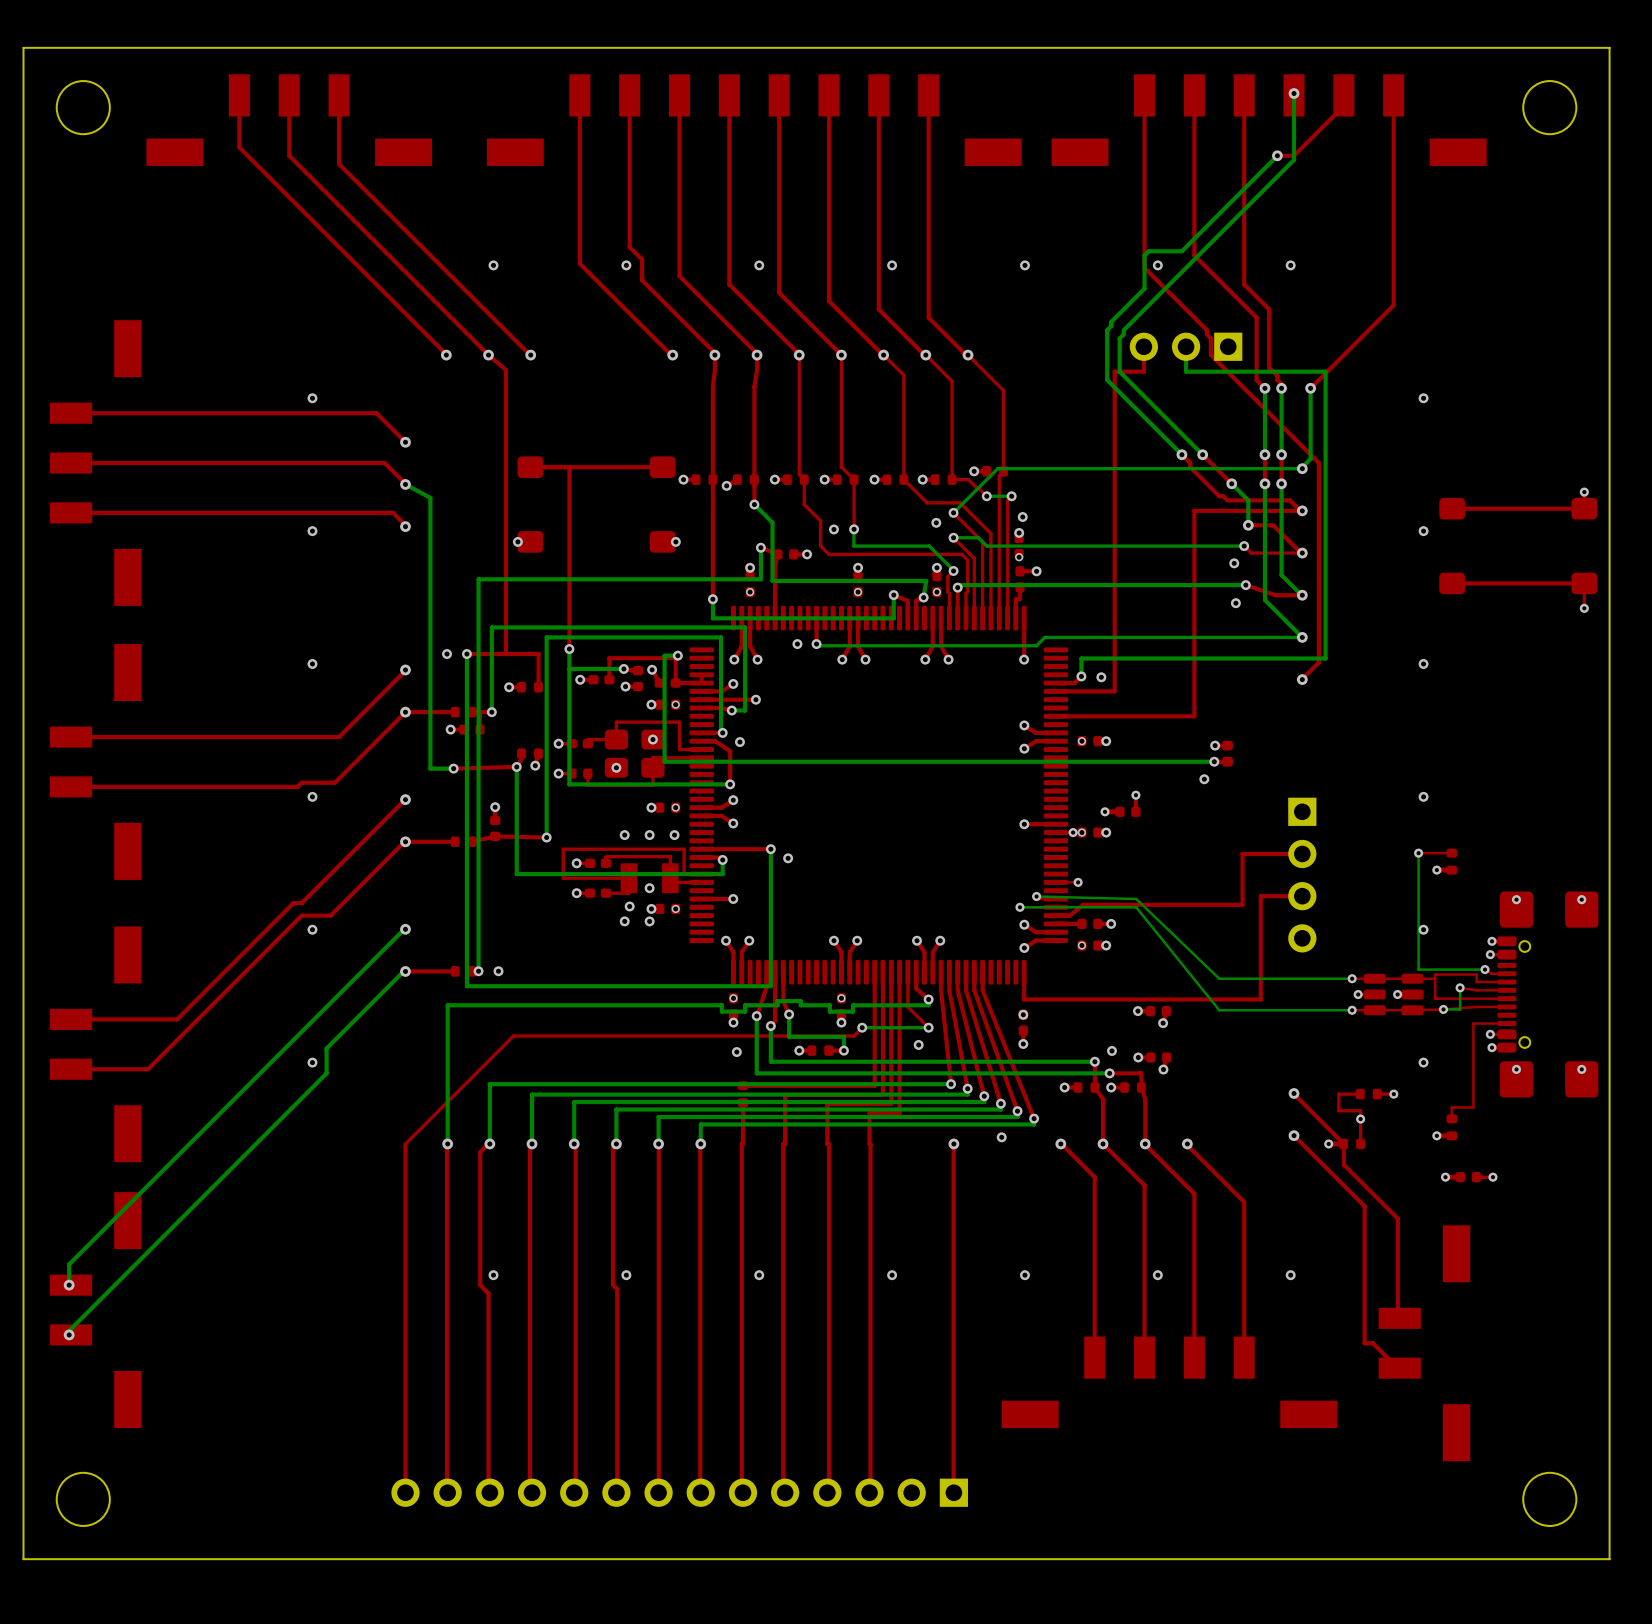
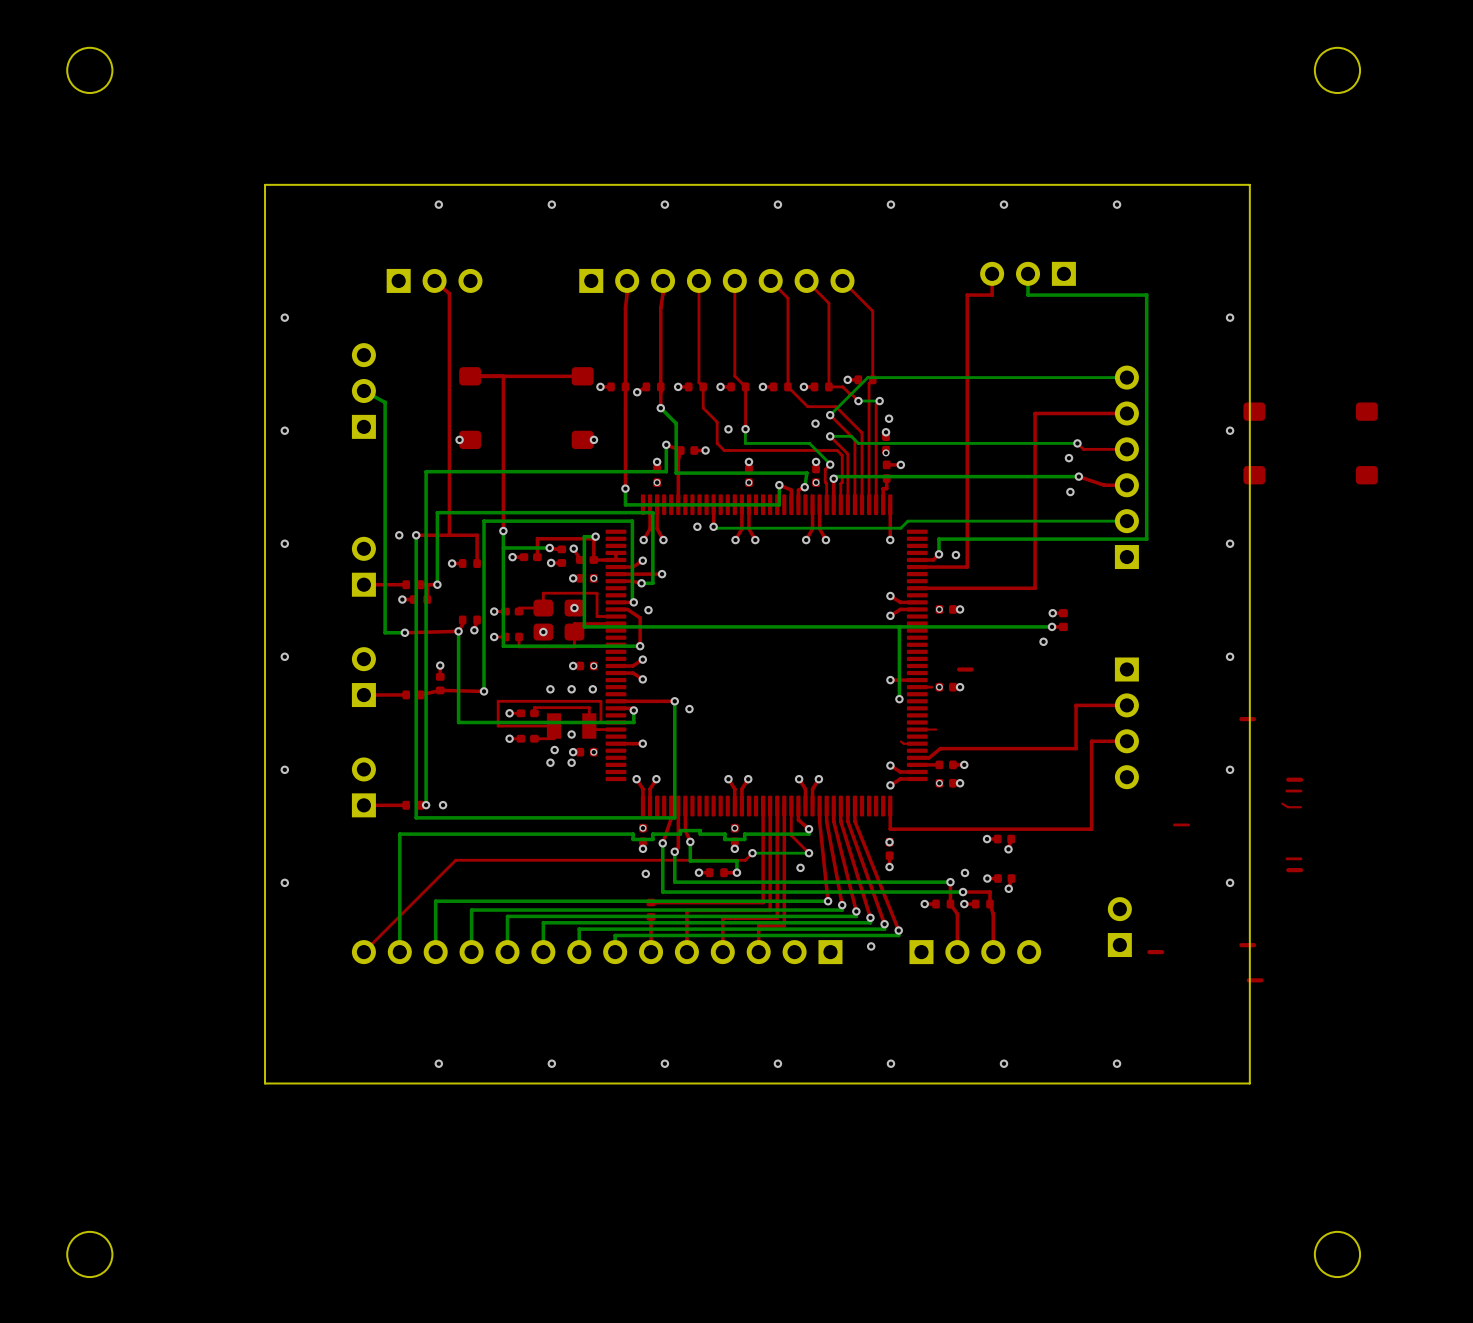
board edge: (1609, 47) (23, 47) (23, 1559) (1609, 1559) (1609, 47) -> (1249, 184) (1249, 1083) (265, 1083) (265, 184) (1249, 184)
top track: (239, 93) (239, 147) (446, 355) -> none
top track: (289, 93) (289, 155) (488, 355) -> none
top track: (339, 93) (339, 164) (530, 355) -> none
top track: (579, 93) (579, 263) (672, 355) -> none
top track: (629, 93) (629, 247) (642, 259) (642, 280) (716, 355) (714, 355) -> none
top track: (679, 93) (679, 276) (757, 355) -> none
top track: (729, 93) (729, 284) (799, 355) -> none
top track: (779, 93) (779, 292) (841, 355) -> none
top track: (828, 93) (828, 301) (883, 355) -> none
top track: (878, 93) (878, 309) (925, 355) -> none
top track: (928, 93) (928, 317) (968, 355) -> none
top track: (1144, 93) (1144, 267) (1206, 330) (1206, 334) (1210, 338) (1210, 355) (1318, 463) (1318, 662) (1302, 679) -> none
top track: (1194, 93) (1194, 255) (1256, 317) (1256, 379) (1264, 388) -> none
top track: (1244, 93) (1244, 284) (1269, 309) (1269, 367) (1277, 375) (1281, 388) -> none
bottom track: (1294, 93) (1294, 159) (1123, 330) (1123, 334) (1119, 338) (1119, 371) (1202, 454) -> none
via: (1294, 93) -> none
top track: (1343, 93) (1343, 105) (1294, 155) (1277, 155) -> none
top track: (1393, 93) (1393, 305) (1310, 388) -> none
part: (289, 120) -> none
part: (754, 120) -> none
part: (1269, 120) -> none
bottom track: (1277, 155) (1181, 251) (1148, 251) (1144, 255) (1144, 288) (1111, 321) (1111, 326) (1107, 330) (1107, 379) (1181, 454) -> none
via: (1277, 155) -> none
via: (446, 355) -> none
part: none -> (434, 280)
via: (488, 355) -> none
via: (530, 355) -> none
via: (672, 355) -> none
via: (714, 355) -> none
via: (757, 355) -> none
via: (799, 355) -> none
part: none -> (716, 280)
via: (841, 355) -> none
via: (883, 355) -> none
via: (925, 355) -> none
via: (968, 355) -> none
bottom track: (1264, 388) (1264, 454) -> none
via: (1264, 388) -> none
bottom track: (1281, 388) (1281, 454) -> none
via: (1281, 388) -> none
bottom track: (1310, 388) (1310, 458) (1302, 468) -> none
via: (1310, 388) -> none
top track: (69, 413) (376, 413) (405, 442) -> none
via: (405, 442) -> none
top track: (1181, 454) (1190, 463) (1190, 467) (1219, 496) (1223, 496) (1227, 500) (1289, 500) (1302, 512) (1302, 510) -> none
via: (1181, 454) -> none
top track: (1202, 454) (1231, 483) -> none
via: (1202, 454) -> none
top track: (1264, 454) (1264, 483) -> none
via: (1264, 454) -> none
top track: (1281, 454) (1281, 483) -> none
via: (1281, 454) -> none
top track: (69, 463) (384, 463) (405, 484) -> none
part: (95, 463) -> none
via: (1302, 468) -> none
bottom track: (1231, 483) (1248, 500) (1248, 525) -> none
via: (1231, 483) -> none
bottom track: (1264, 483) (1264, 600) (1302, 637) -> none
via: (1264, 483) -> none
bottom track: (1281, 483) (1281, 575) (1302, 595) -> none
via: (1281, 483) -> none
part: none -> (363, 390)
via: (405, 484) -> none
top track: (1584, 492) (1584, 508) (1452, 508) -> none
via: (1584, 492) -> none
via: (1302, 510) -> none
top track: (69, 512) (393, 512) (405, 526) -> none
top track: (1248, 525) (1273, 525) (1302, 553) -> none
via: (1248, 525) -> none
via: (405, 526) -> none
via: (1302, 553) -> none
part: none -> (1126, 467)
top track: (1452, 583) (1584, 583) (1584, 608) -> none
via: (1302, 595) -> none
via: (1584, 608) -> none
via: (1302, 637) -> none
top track: (405, 669) (339, 737) (69, 737) -> none
via: (405, 669) -> none
via: (1302, 679) -> none
part: none -> (363, 566)
top track: (405, 712) (334, 782) (301, 782) (297, 786) (69, 786) -> none
via: (405, 712) -> none
part: (95, 761) -> none
bottom track: none -> (899, 626) (899, 699)
top track: (1135, 795) (1135, 811) -> none
via: (1135, 795) -> none
top track: (405, 799) (301, 903) (293, 903) (177, 1019) (69, 1019) -> none
via: (405, 799) -> none
via: (1105, 811) -> none
part: (1127, 811) -> none
part: none -> (363, 677)
via: (1073, 832) -> none
top track: (405, 841) (330, 915) (301, 915) (148, 1069) (69, 1069) -> none
via: (405, 841) -> none
via: none -> (899, 699)
bottom track: (1418, 853) (1418, 969) (1485, 969) -> none
via: (1418, 853) -> none
top track: (1451, 853) (1418, 853) -> none
part: (1451, 861) -> none
via: (1436, 870) -> none
via: (1078, 882) -> none
bottom track: (1036, 896) (1136, 898) (1219, 978) (1352, 978) -> none
via: (1036, 896) -> none
via: (1516, 899) -> none
via: (1581, 899) -> none
bottom track: (1019, 907) (1136, 907) (1219, 1010) (1352, 1010) -> none
via: (1019, 907) -> none
bottom track: (405, 929) (69, 1264) (69, 1285) -> none
via: (405, 929) -> none
via: (1491, 941) -> none
part: none -> (363, 787)
via: (1490, 954) -> none
via: (1485, 969) -> none
bottom track: (405, 971) (405, 969) (326, 1048) (326, 1073) (69, 1330) (69, 1334) -> none
via: (405, 971) -> none
via: (1352, 978) -> none
top track: (1435, 978) (1352, 978) -> none
top track: (1506, 982) (1476, 982) (1476, 974) (1435, 974) (1435, 998) (1506, 998) -> none
top track: (1460, 987) (1476, 990) (1506, 990) -> none
bottom track: (1460, 987) (1460, 1009) (1443, 1009) -> none
via: (1460, 987) -> none
via: (1358, 994) -> none
part: (1393, 994) -> none
via: (1397, 994) -> none
part: (1547, 994) -> none
top track: (1506, 1006) (1352, 1010) -> none
via: (1443, 1009) -> none
via: (1352, 1010) -> none
top track: (1506, 1023) (1473, 1023) (1473, 1107) (1451, 1107) (1451, 1118) -> none
via: (1490, 1034) -> none
part: (95, 1044) -> none
via: (1491, 1047) -> none
via: (1516, 1069) -> none
via: (1581, 1069) -> none
top track: (1294, 1093) (1343, 1143) (1343, 1164) (1397, 1218) (1397, 1318) (1399, 1318) -> none
via: (1294, 1093) -> none
top track: (1360, 1094) (1338, 1094) (1338, 1110) (1360, 1110) (1360, 1143) (1360, 1119) -> none
part: (1368, 1094) -> none
top track: (1393, 1094) (1377, 1094) -> none
via: (1393, 1094) -> none
part: none -> (1119, 927)
via: (1360, 1119) -> none
part: (1451, 1127) -> none
top track: (1294, 1135) (1364, 1206) (1364, 1343) (1372, 1343) (1399, 1368) -> none
via: (1294, 1135) -> none
via: (1436, 1135) -> none
top track: (405, 1143) (405, 1492) -> none
top track: (447, 1143) (447, 1492) -> none
via: (447, 1143) -> none
top track: (489, 1143) (480, 1152) (480, 1285) (488, 1293) (489, 1492) -> none
via: (489, 1143) -> none
top track: (532, 1143) (530, 1143) (530, 1492) (532, 1492) -> none
via: (532, 1143) -> none
top track: (574, 1143) (574, 1492) -> none
via: (574, 1143) -> none
top track: (616, 1143) (613, 1148) (613, 1285) (617, 1289) (616, 1492) -> none
via: (616, 1143) -> none
top track: (658, 1143) (658, 1492) -> none
via: (658, 1143) -> none
top track: (700, 1143) (700, 1492) -> none
via: (700, 1143) -> none
top track: (742, 1143) (742, 1492) -> none
top track: (785, 1143) (783, 1143) (783, 1492) (785, 1492) -> none
top track: (827, 1143) (828, 1143) (828, 1492) (827, 1492) -> none
top track: (869, 1143) (869, 1492) -> none
top track: (953, 1143) (953, 1492) -> none
via: (953, 1143) -> none
top track: (1060, 1143) (1094, 1177) (1094, 1357) -> none
via: (1060, 1143) -> none
top track: (1103, 1143) (1144, 1185) (1144, 1357) -> none
via: (1103, 1143) -> none
part: none -> (975, 952)
top track: (1145, 1143) (1194, 1193) (1194, 1357) -> none
via: (1145, 1143) -> none
top track: (1187, 1143) (1244, 1202) (1244, 1357) -> none
via: (1187, 1143) -> none
via: (1328, 1143) -> none
part: (1352, 1143) -> none
via: (1445, 1177) -> none
part: (1468, 1177) -> none
top track: (1492, 1177) (1476, 1177) -> none
via: (1492, 1177) -> none
via: (69, 1285) -> none
part: (95, 1310) -> none
via: (69, 1334) -> none
part: (1424, 1343) -> none
part: (1169, 1382) -> none
part position: (679, 1492) -> (597, 952)

